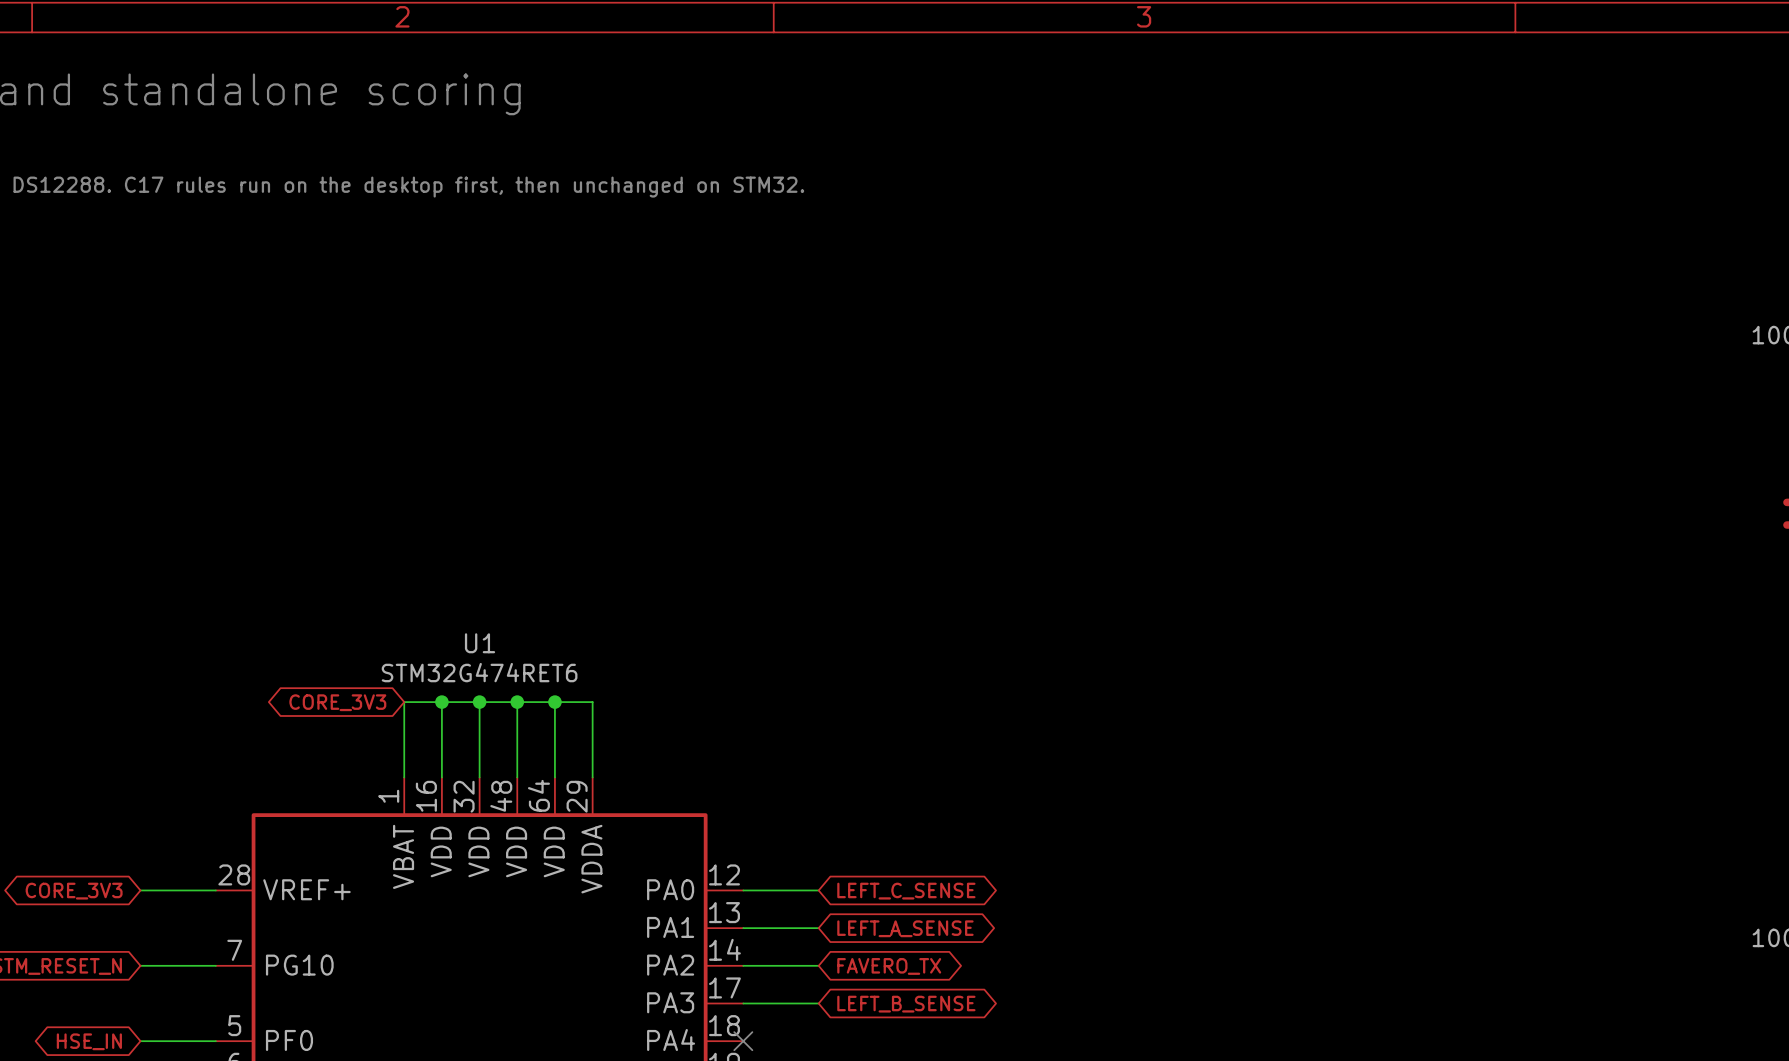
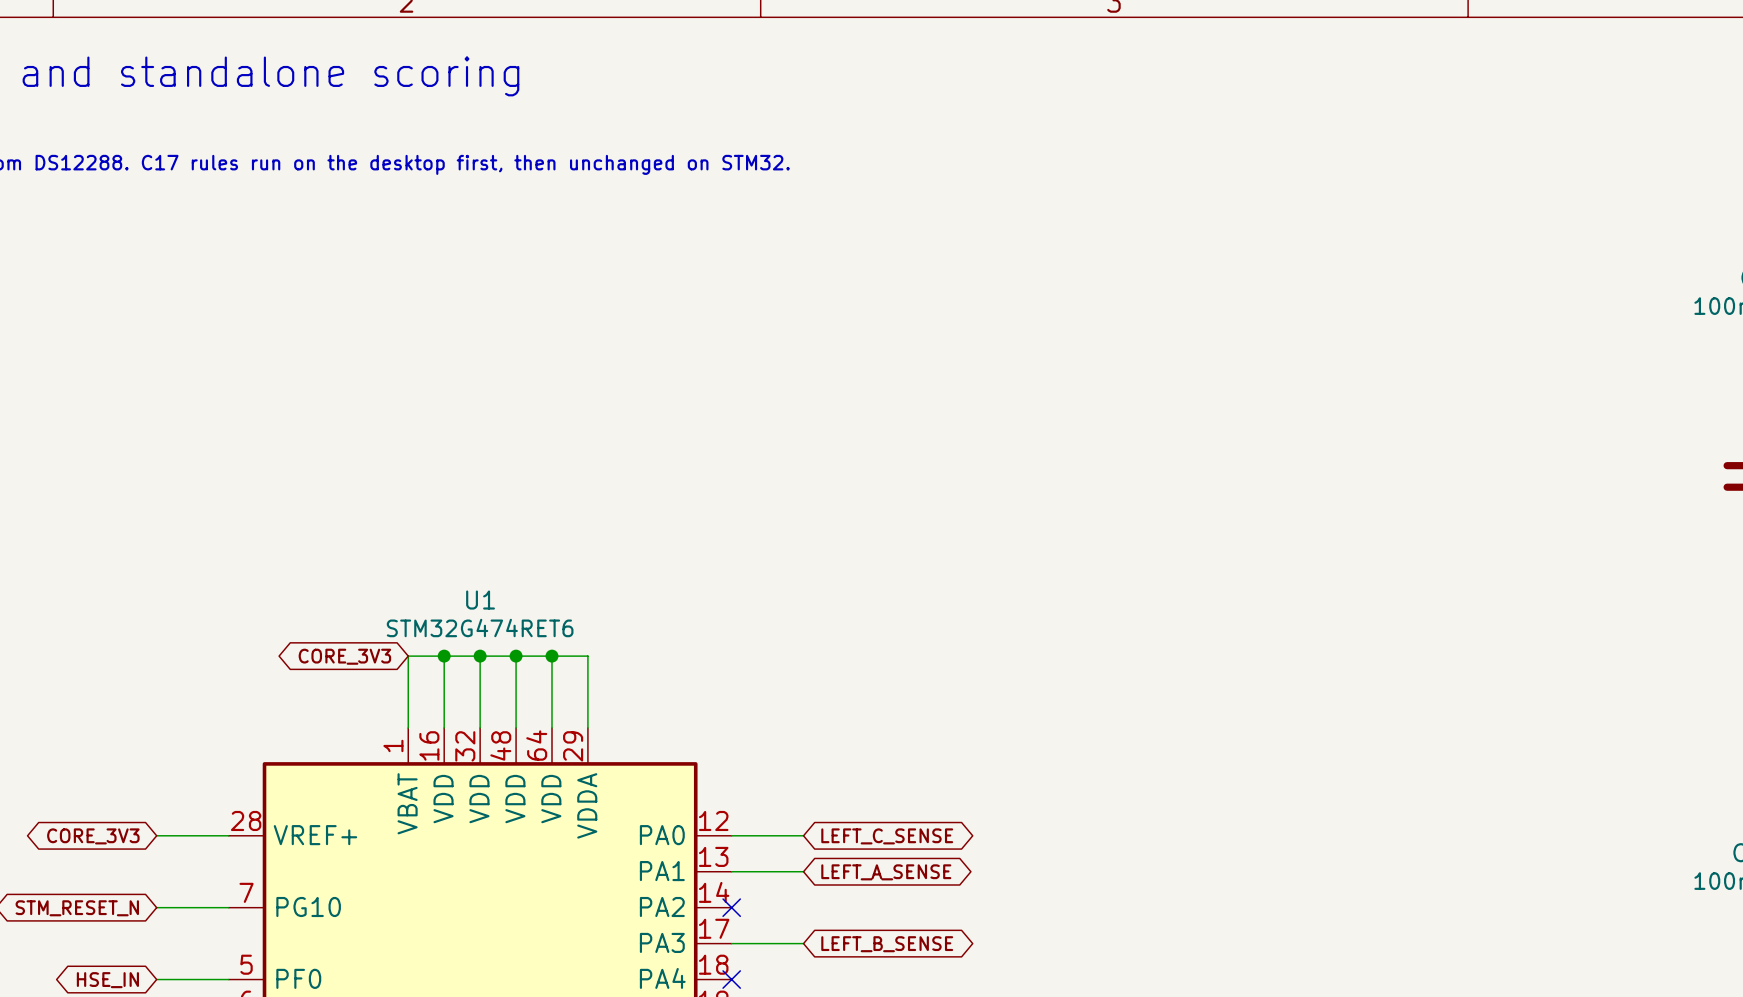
wire: (743, 965) (818, 965) -> none
no-connect mark: none -> (731, 907)
global label: FAVERO_TX (889, 966) -> none

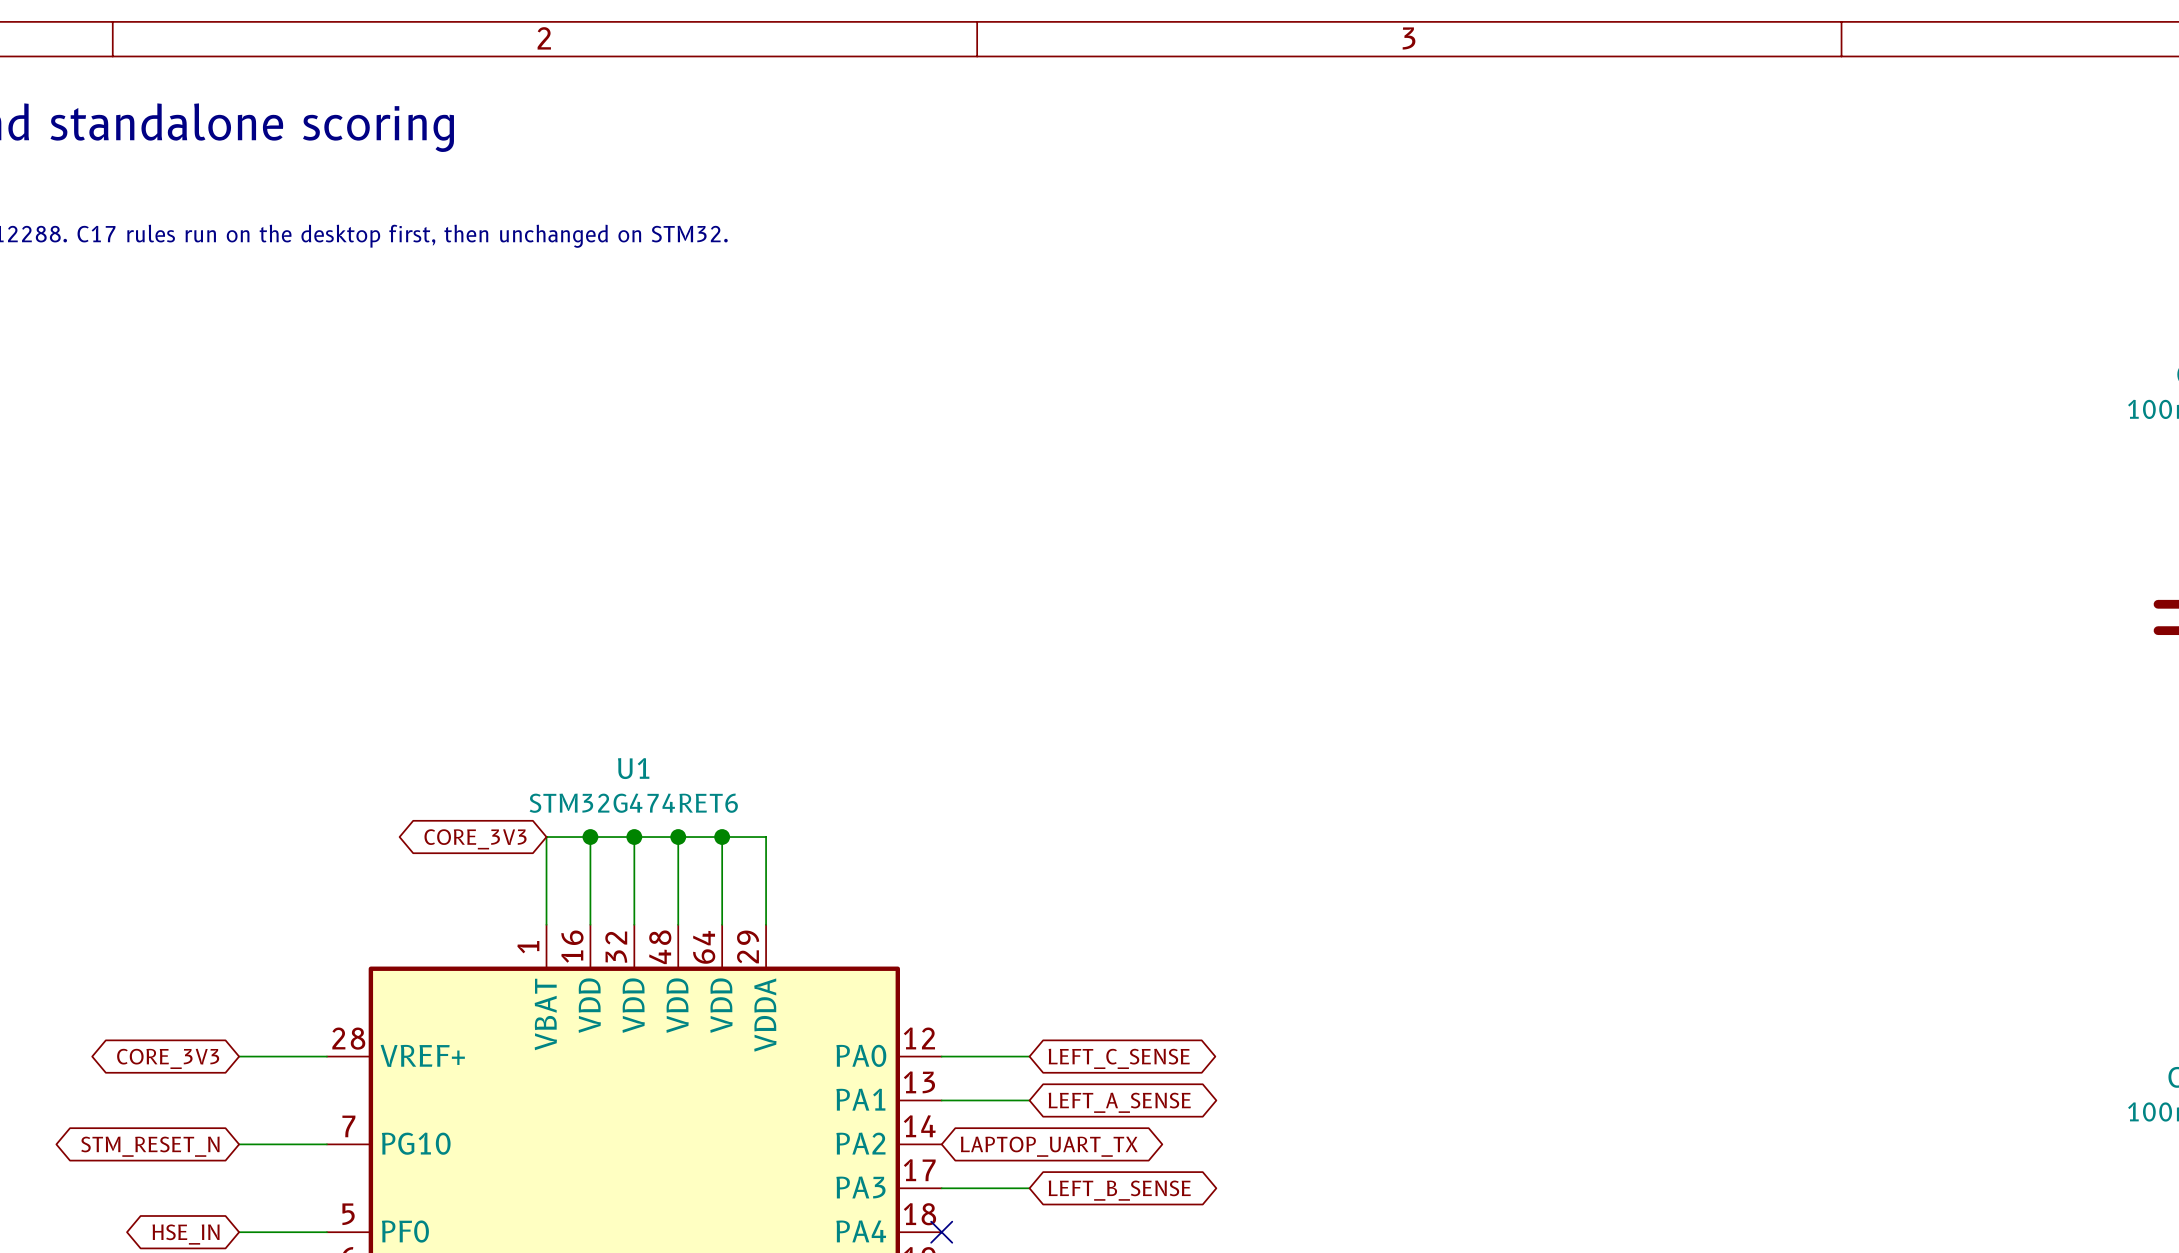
no-connect mark: (731, 907) -> none
global label: none -> LAPTOP_UART_TX (1049, 1146)

